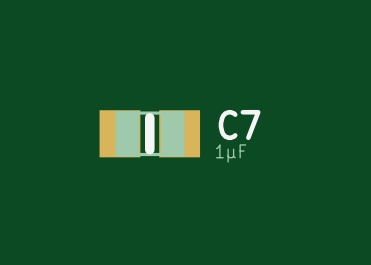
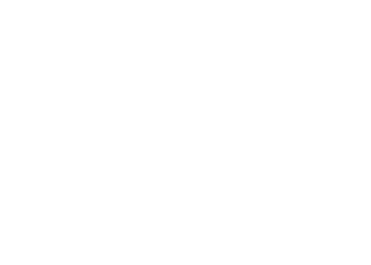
C7: 1µF (149, 133) -> none

